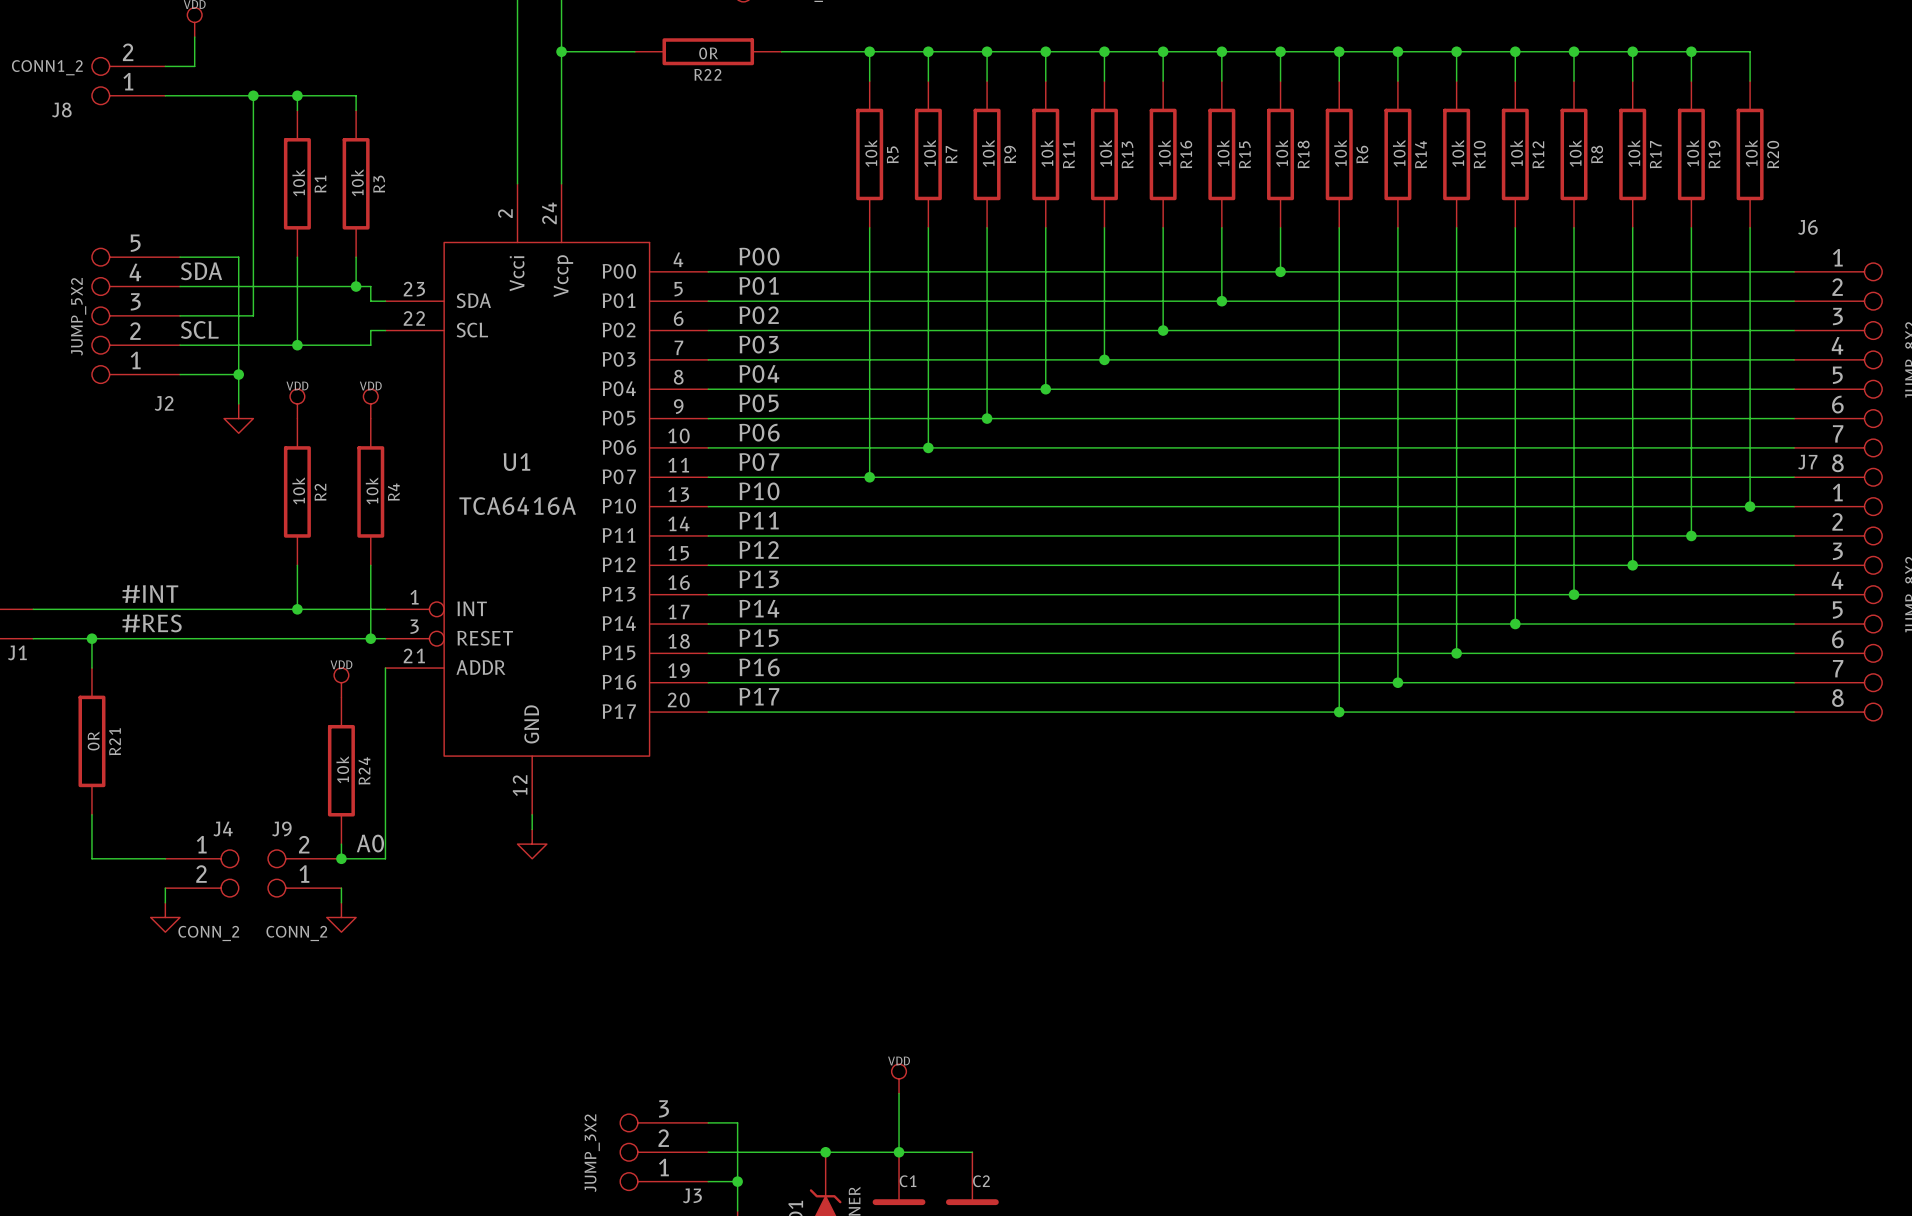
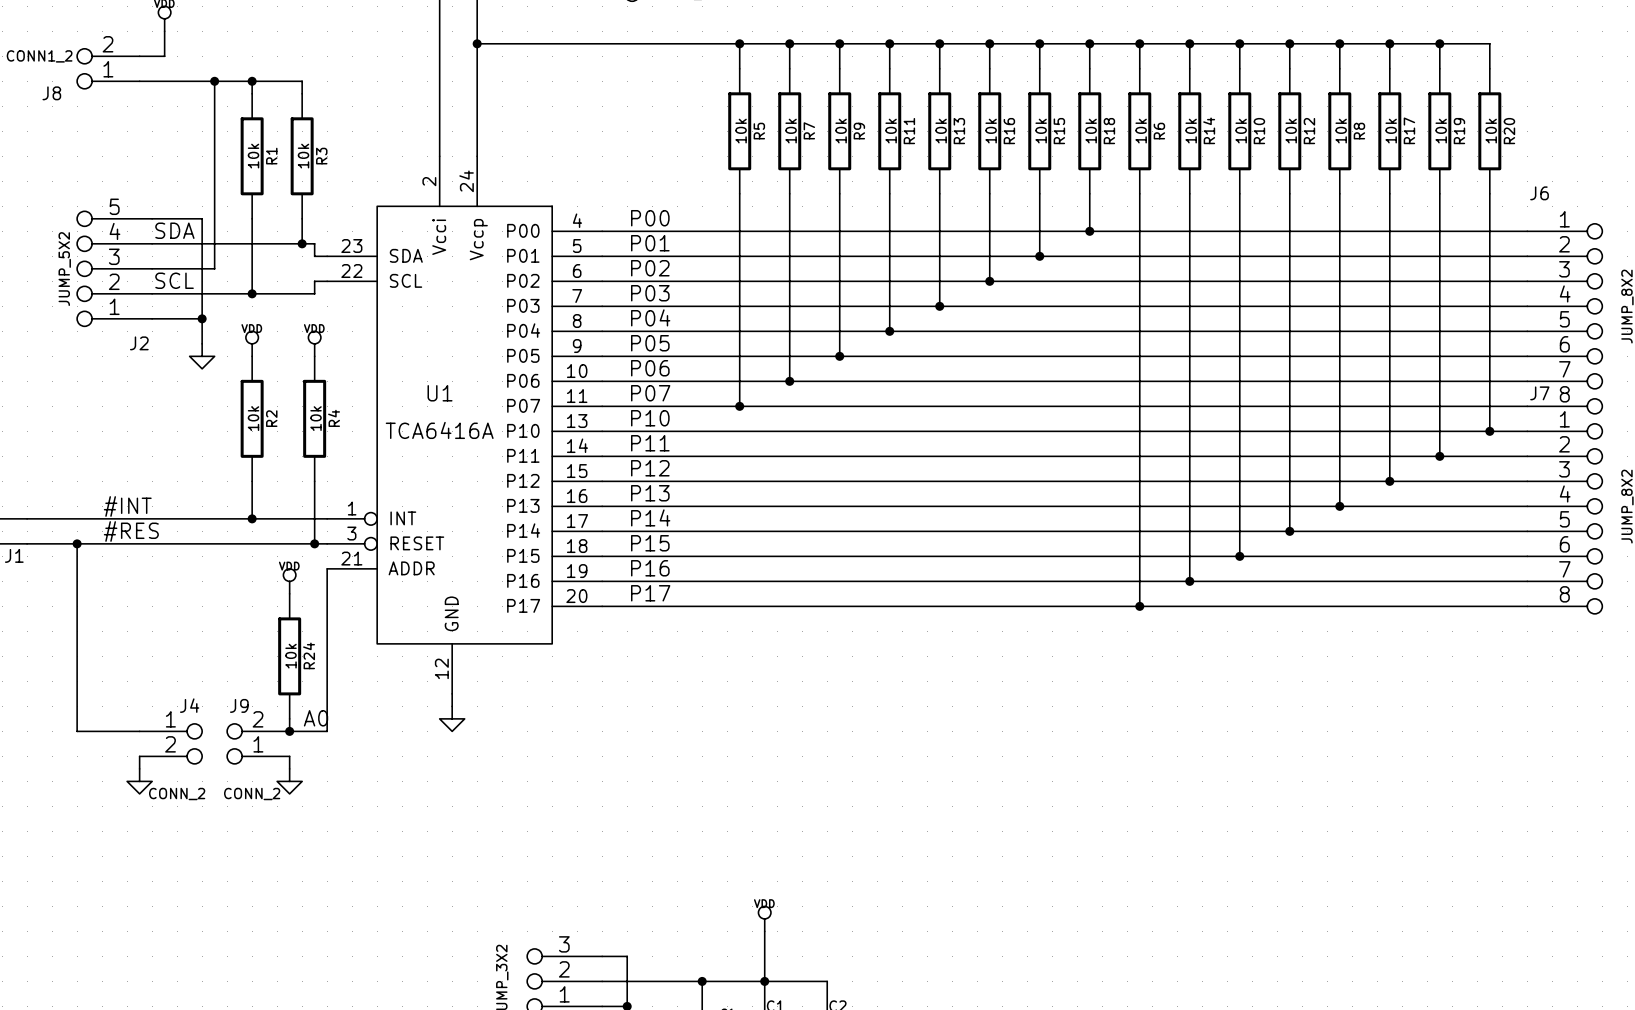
wire: none -> (539, 43) (664, 43)
R22: 0R (708, 51) -> none
wire: none -> (77, 568) (77, 693)
R21: 0R (91, 741) -> none

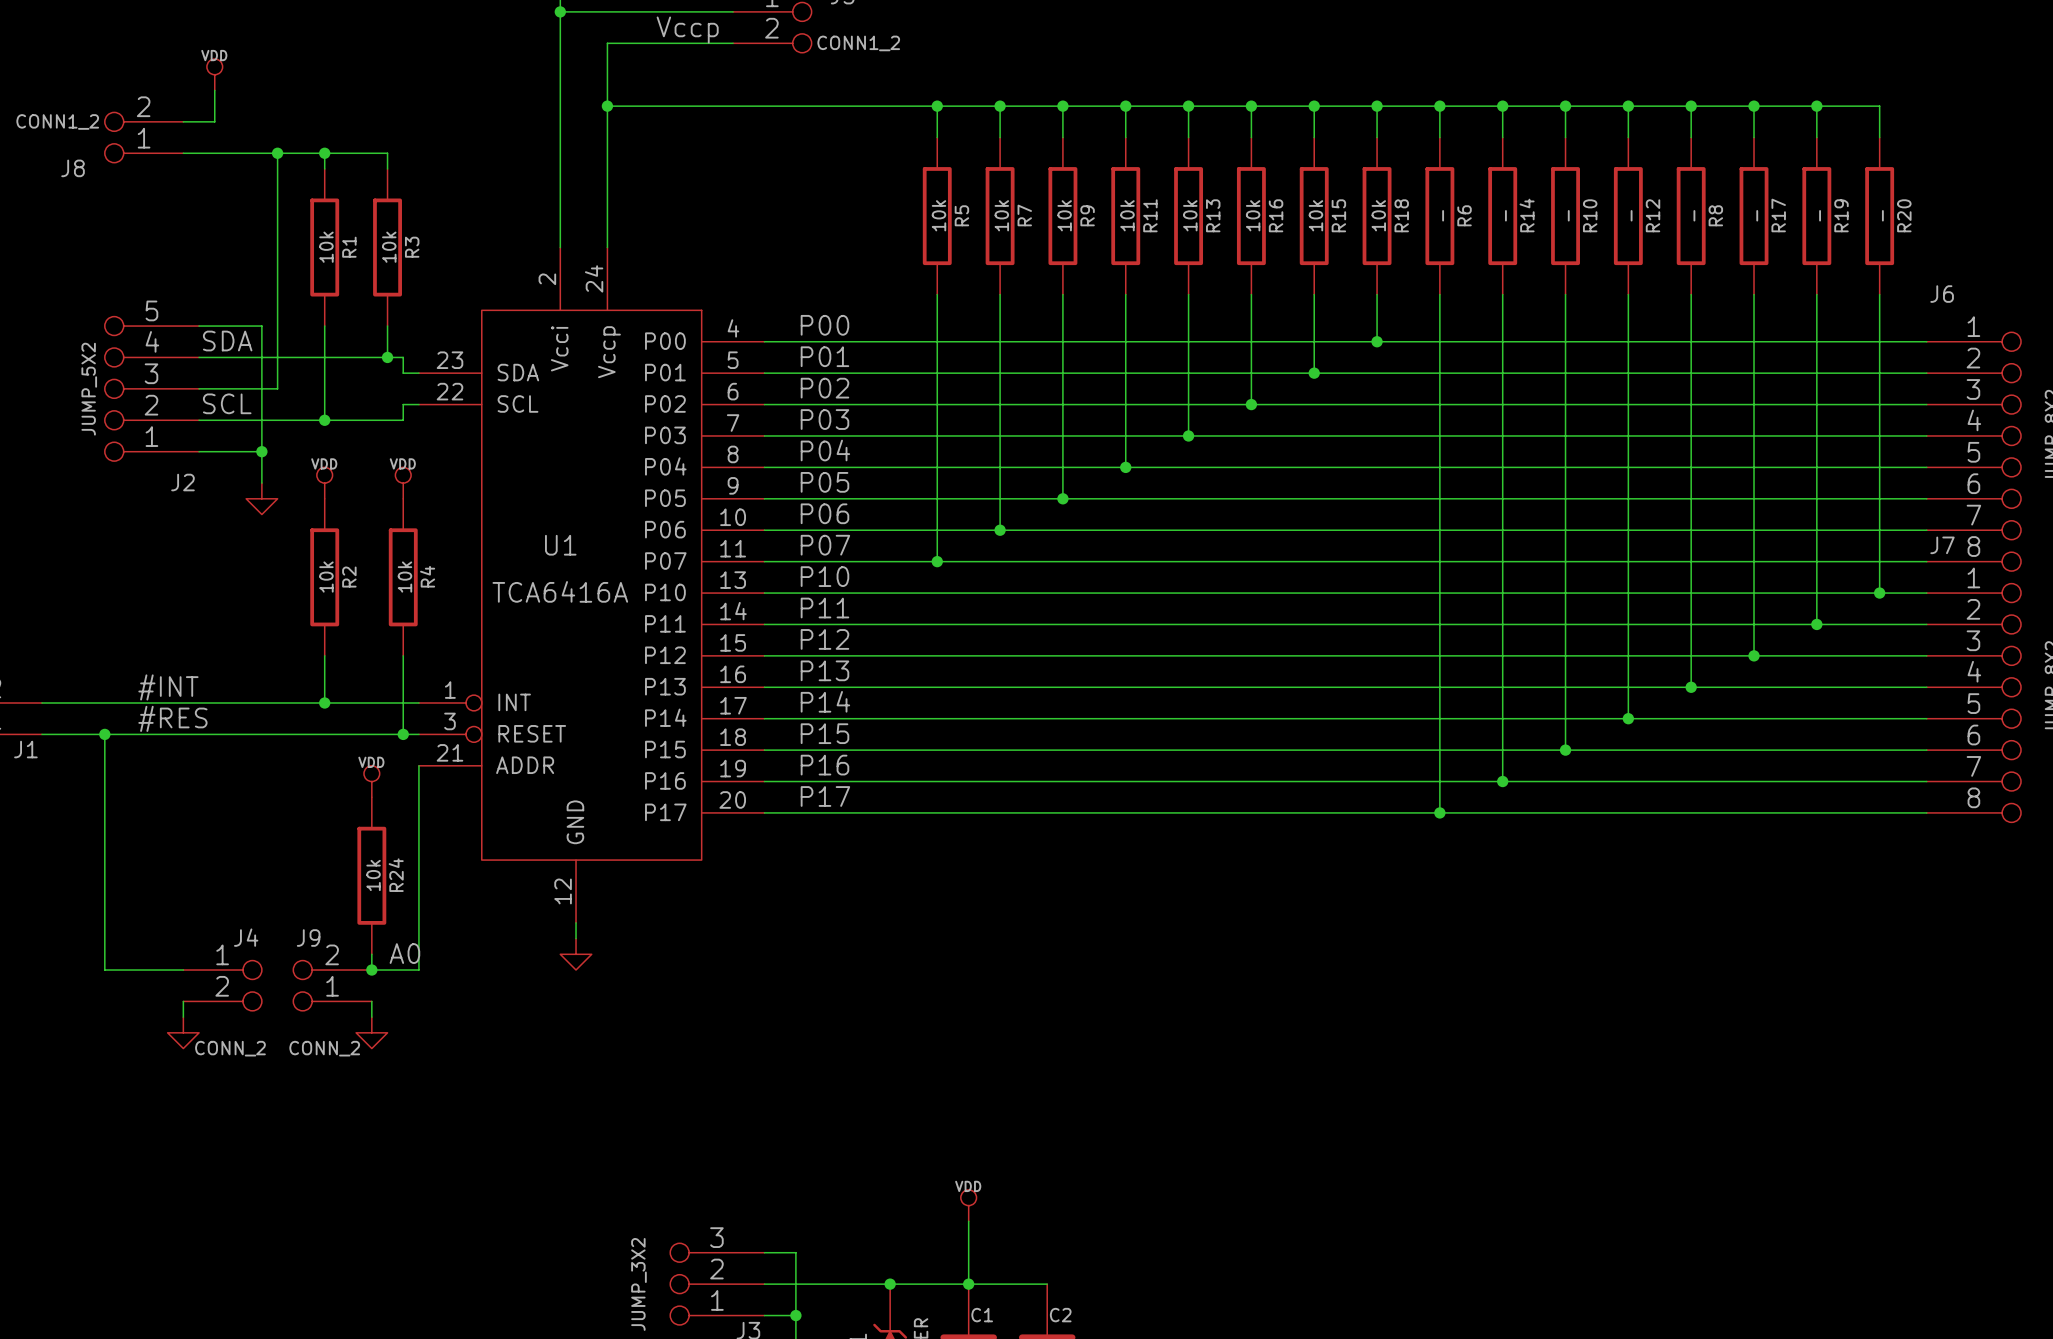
R6 value: 10k (1141, 131) -> - (1443, 215)
R14 value: 10k (1191, 131) -> - (1505, 215)
R10 value: 10k (1241, 131) -> - (1568, 215)
R12 value: 10k (1291, 131) -> - (1631, 215)
R8 value: 10k (1341, 131) -> - (1694, 215)
R17 value: 10k (1391, 131) -> - (1757, 215)
R19 value: 10k (1441, 131) -> - (1820, 215)
R20 value: 10k (1491, 131) -> - (1882, 215)

